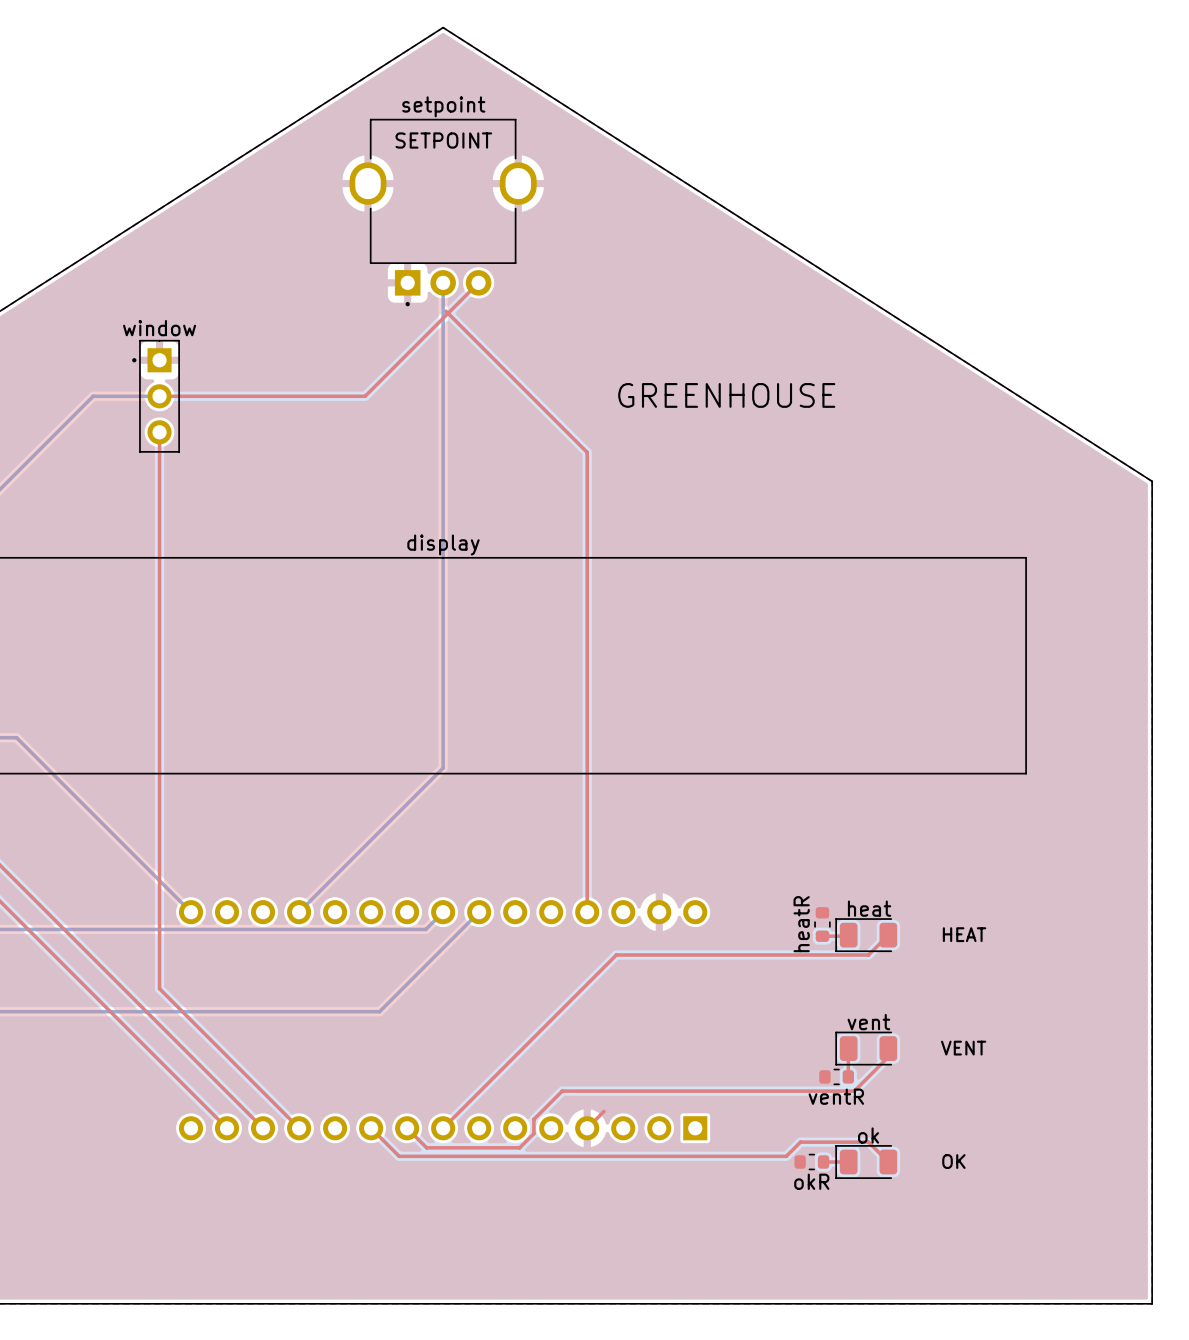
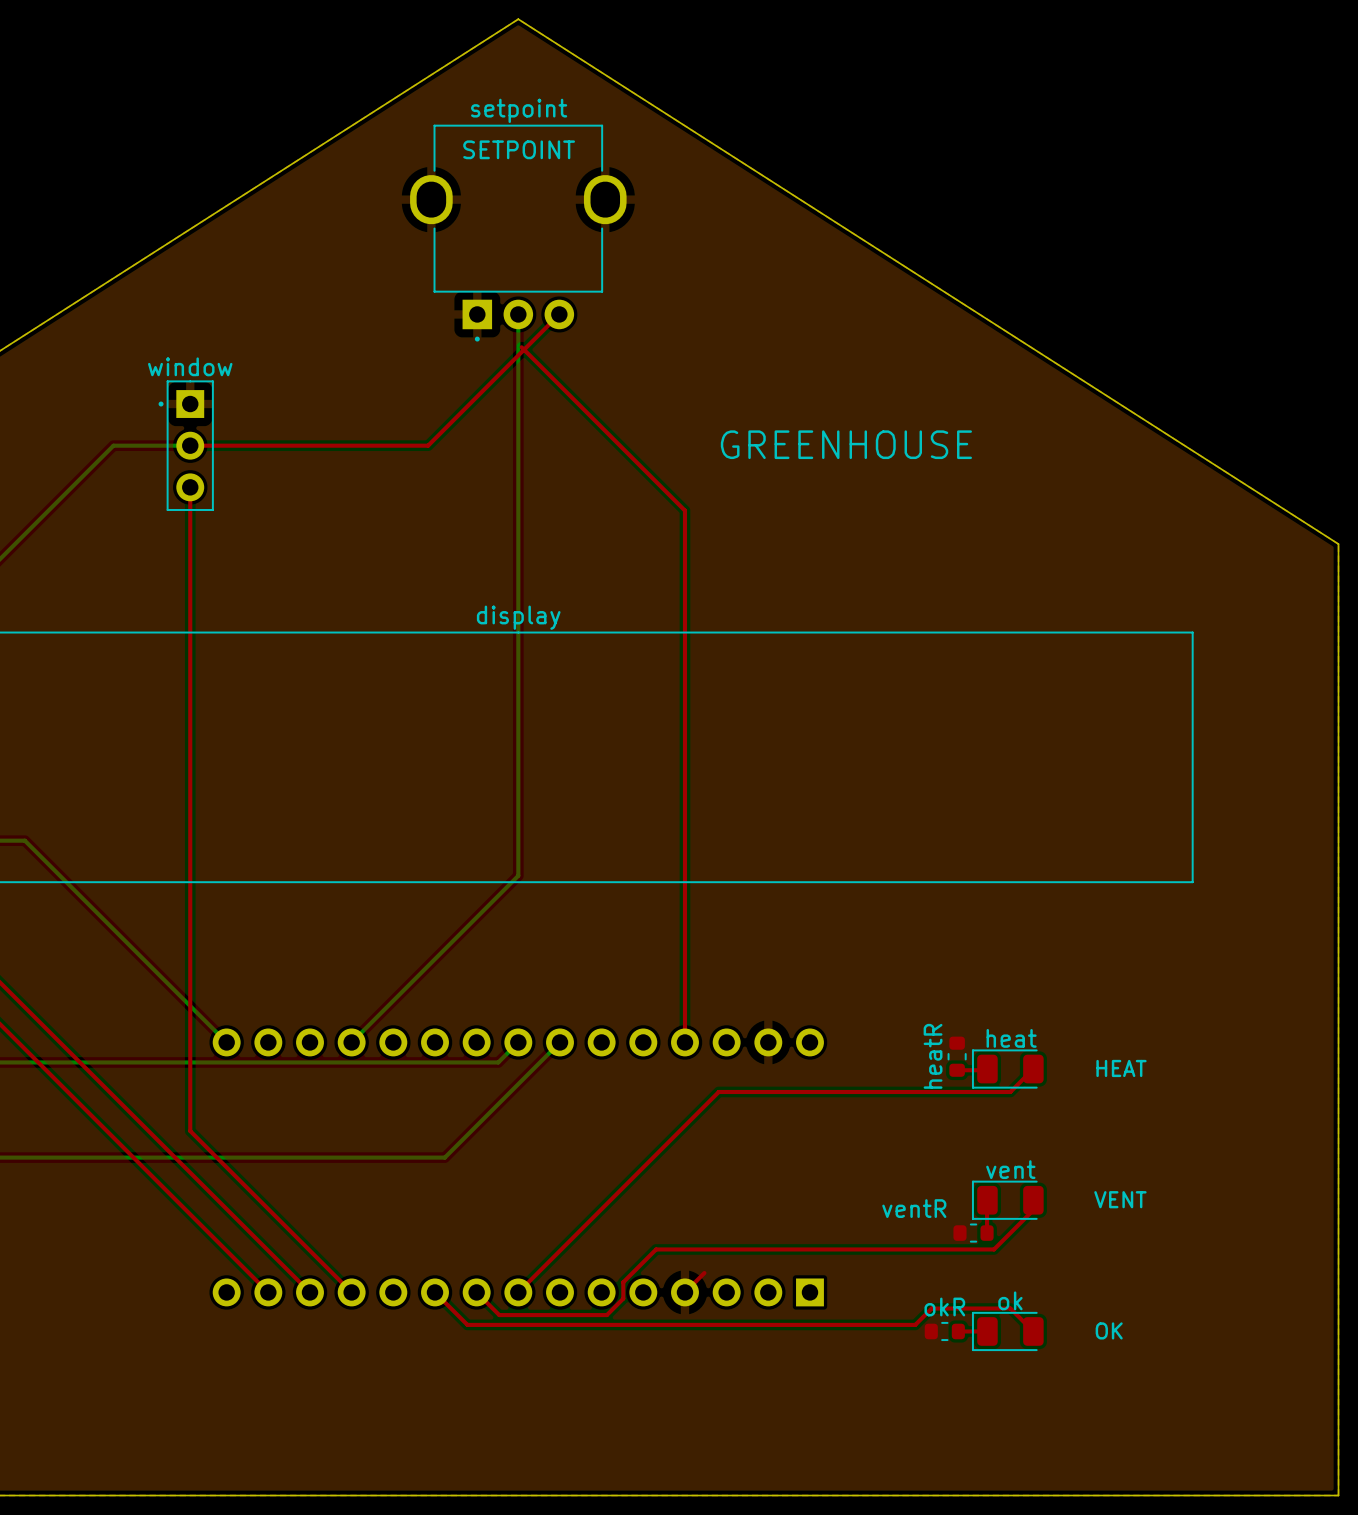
ventR name position: ventR (836, 1096) -> ventR (914, 1208)
okR name position: okR (811, 1181) -> okR (944, 1307)

